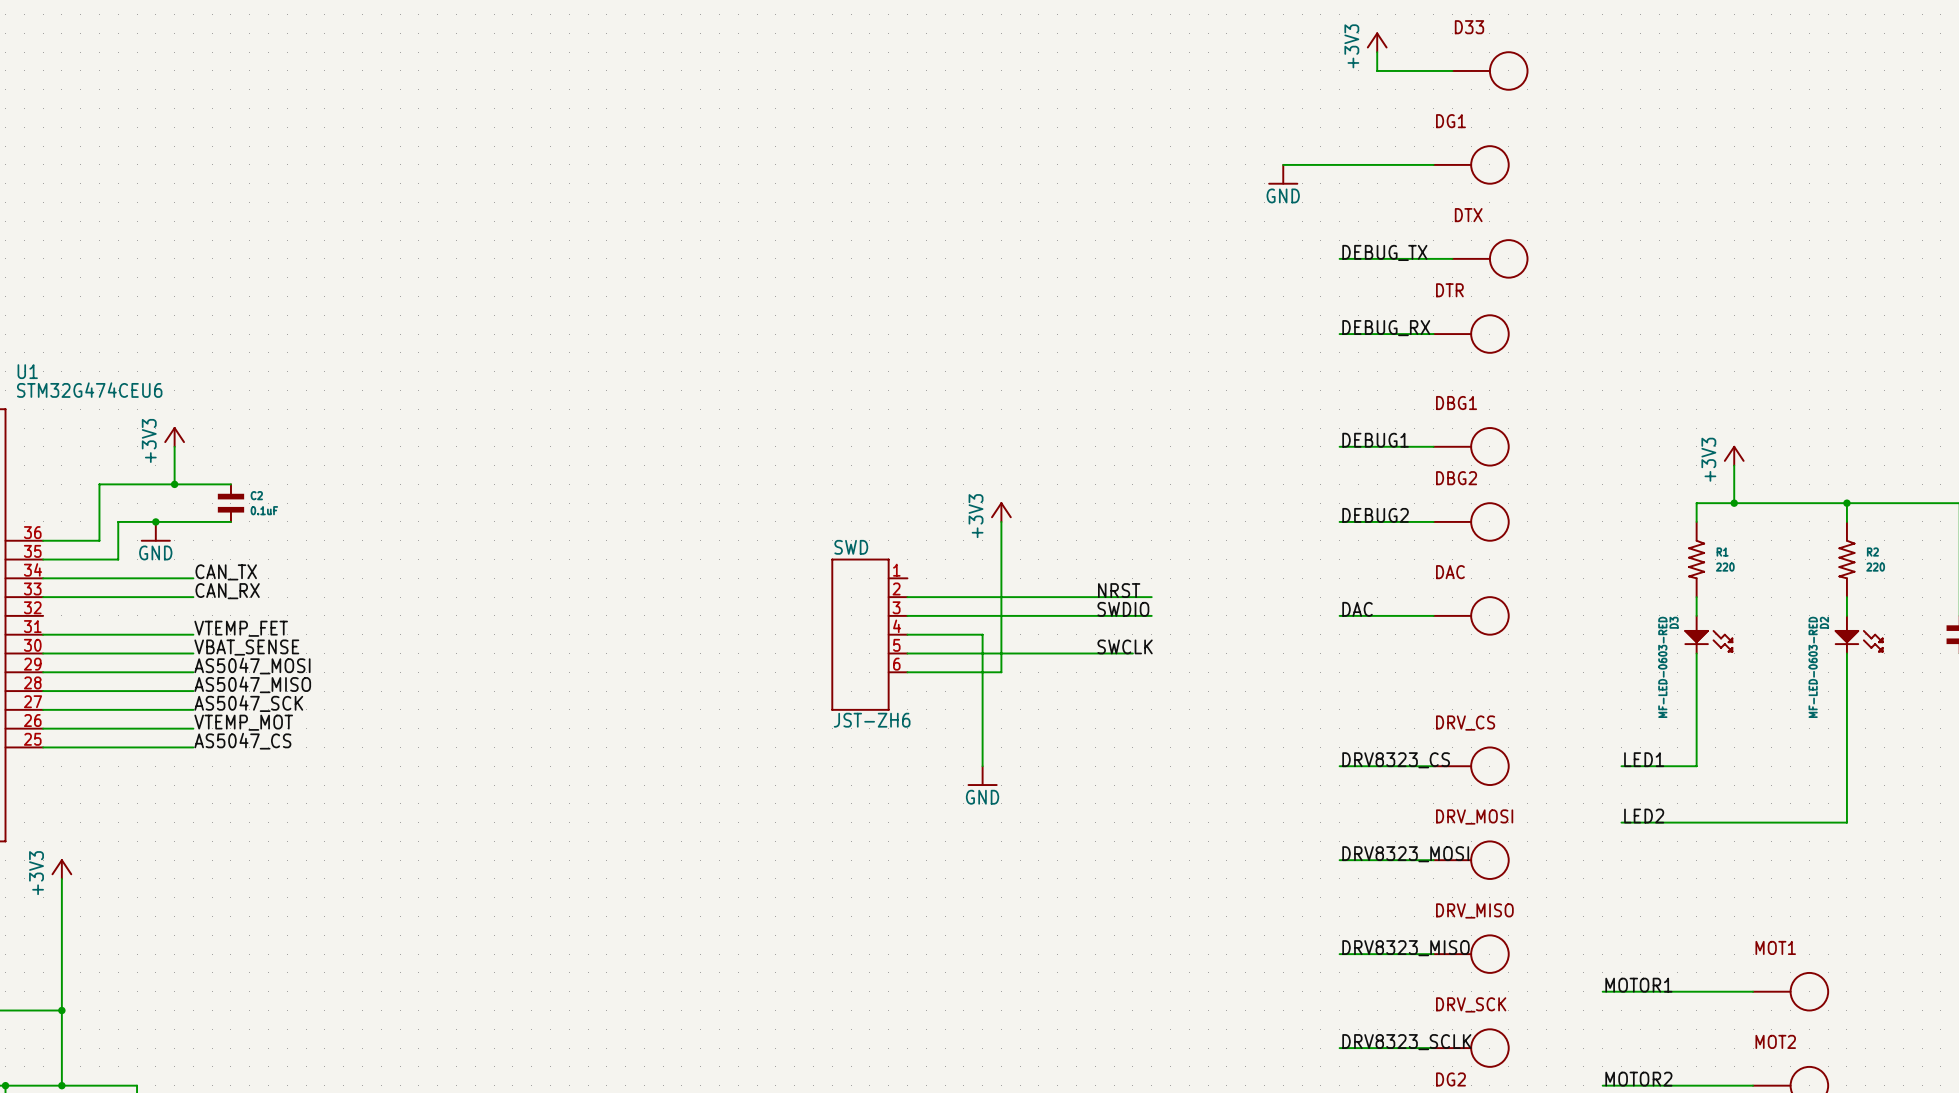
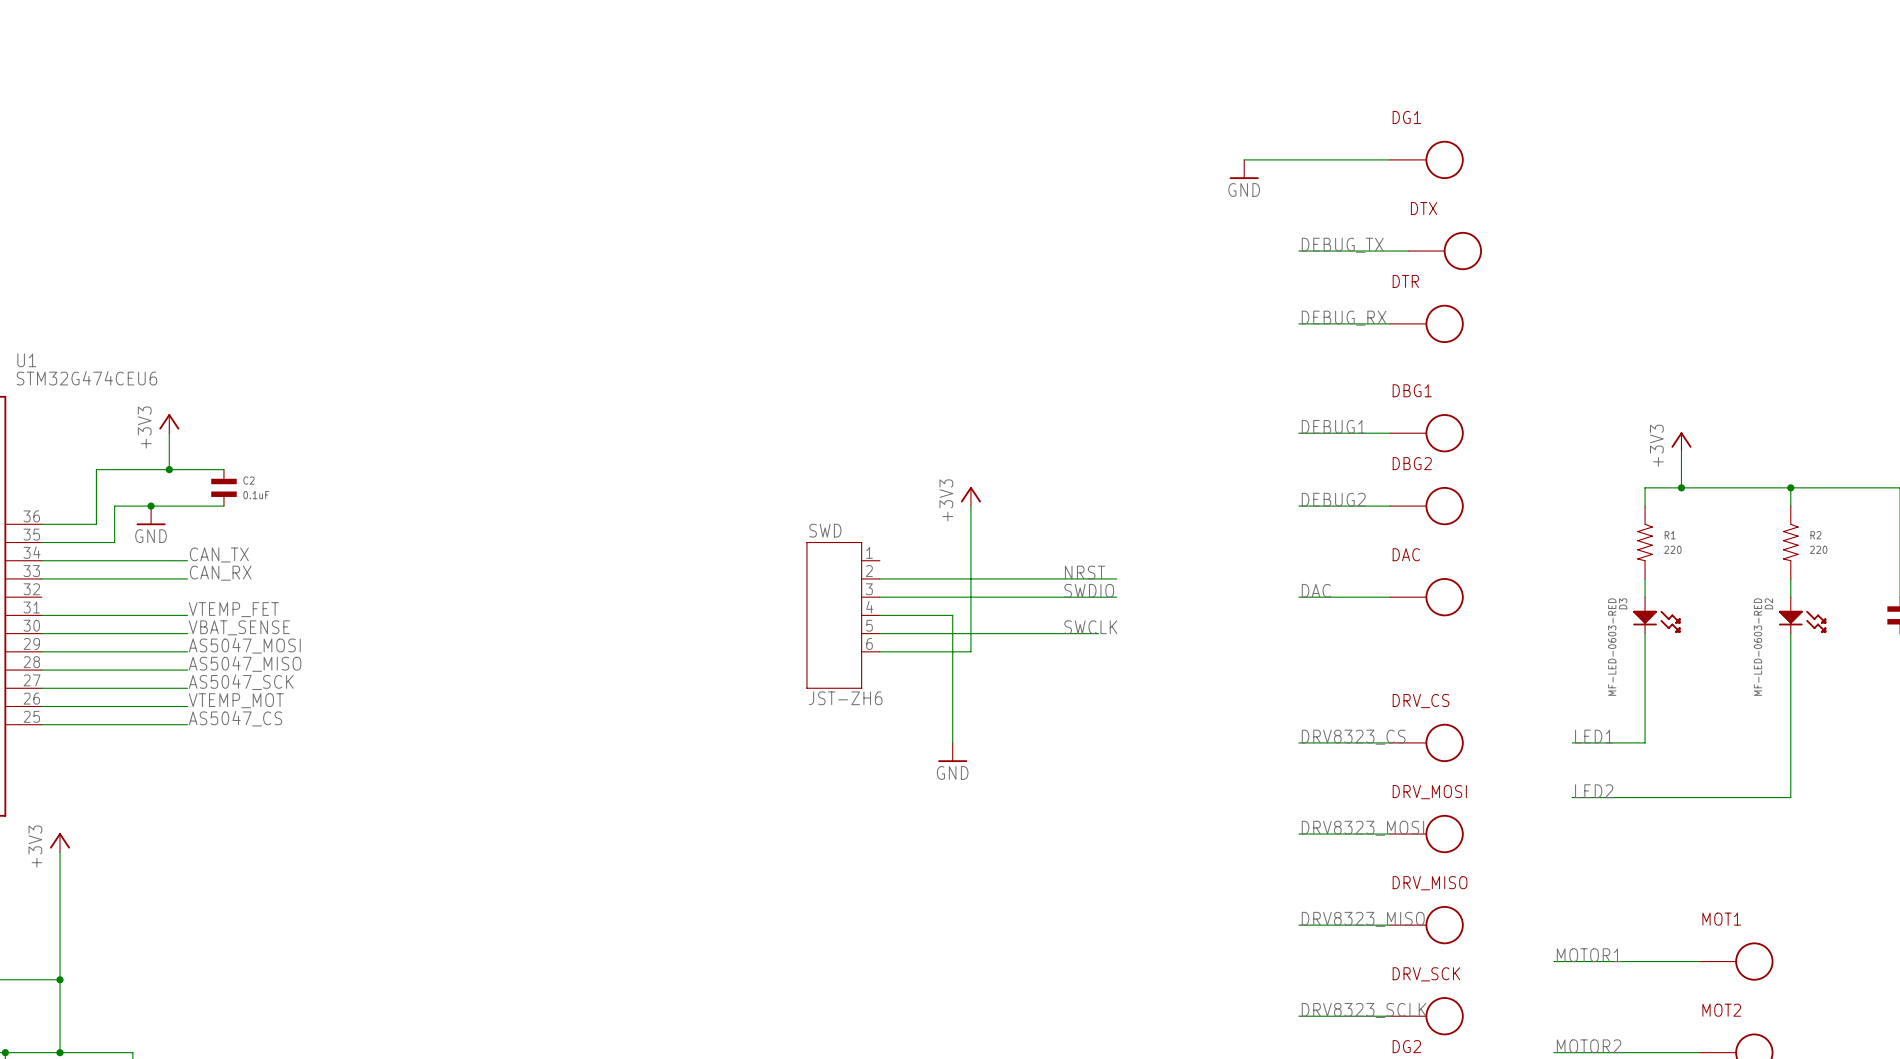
power symbol: +3V3 (1377, 42) -> none
wire: (1377, 52) (1377, 70) (1452, 70) -> none
D33: (1490, 70) -> none

